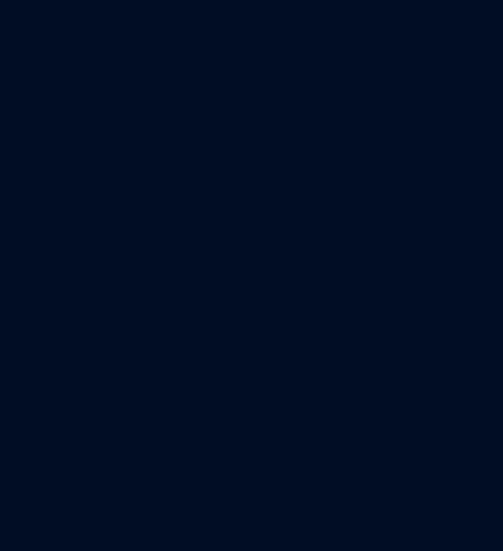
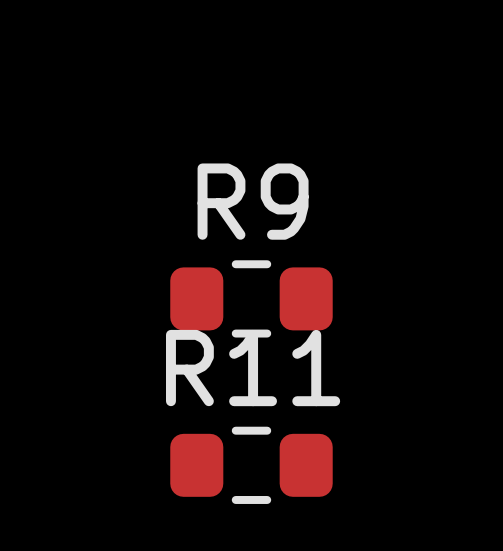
R9: none -> (251, 298)
R11: none -> (251, 465)

